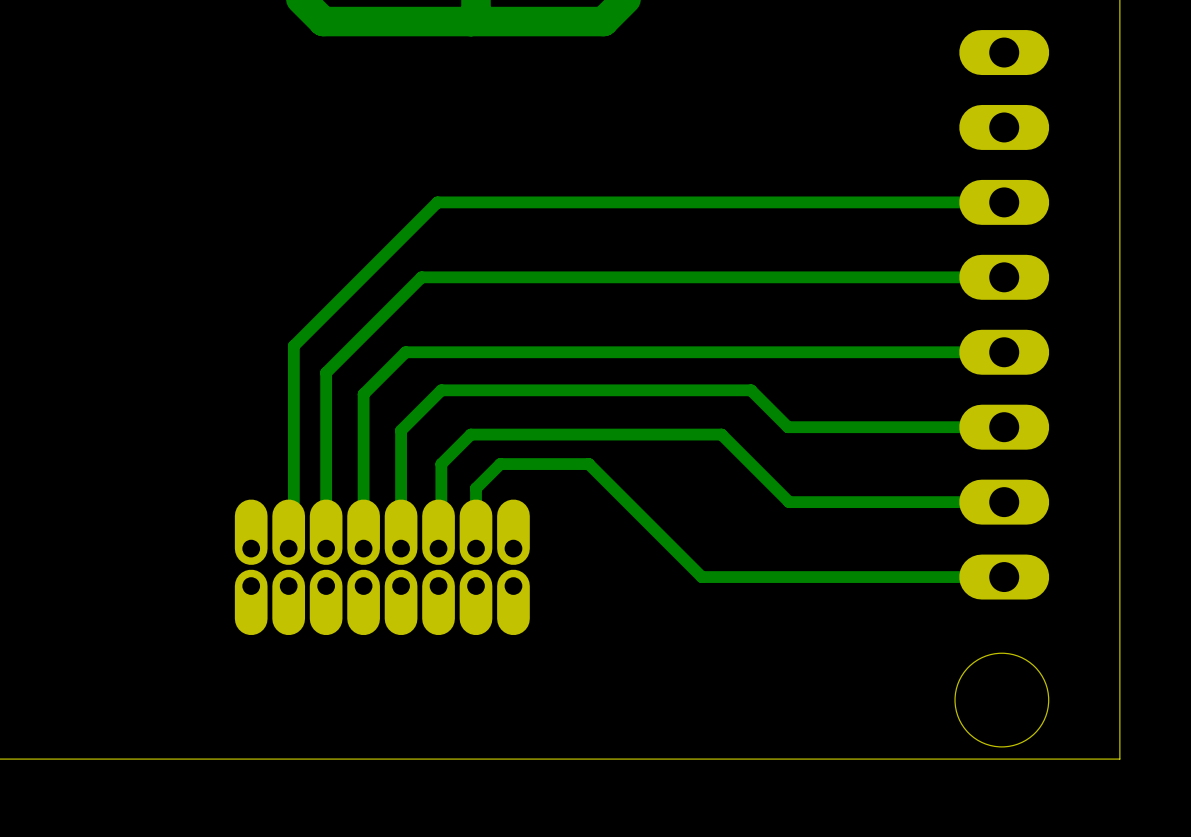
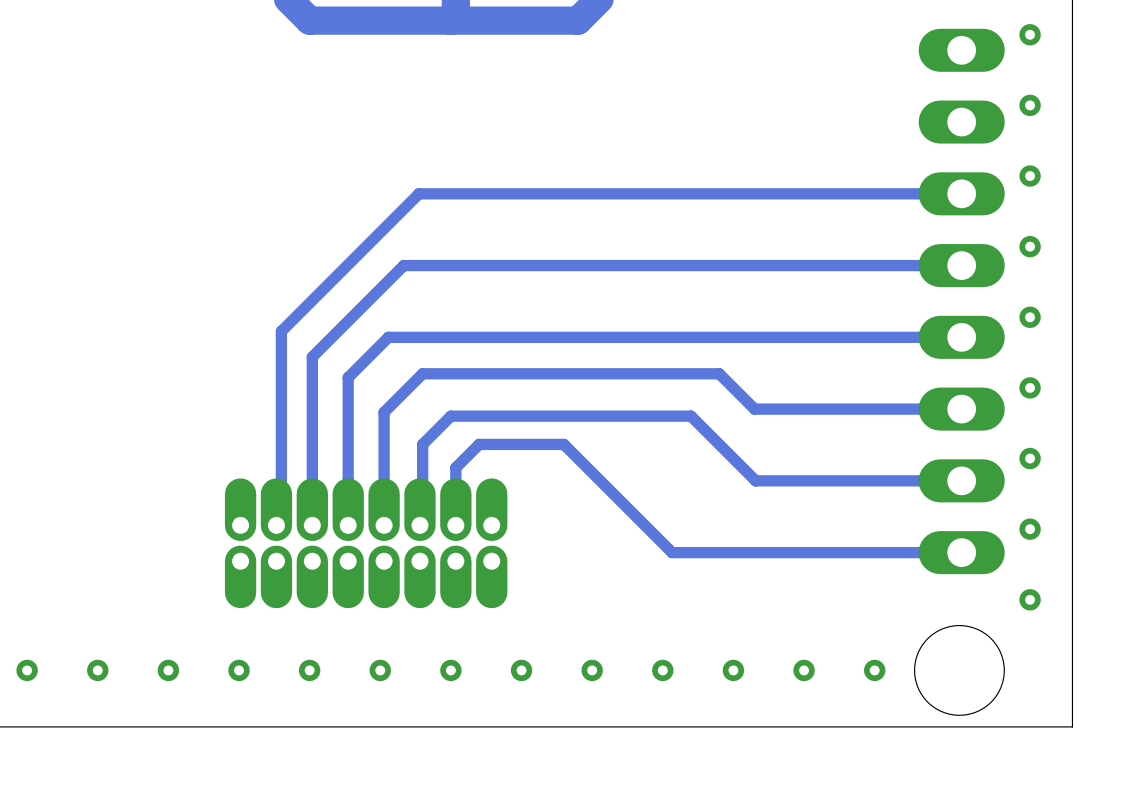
via: none -> (1030, 34)
via: none -> (1030, 105)
via: none -> (1030, 176)
via: none -> (1030, 246)
via: none -> (1030, 317)
via: none -> (1030, 387)
via: none -> (1030, 458)
via: none -> (1030, 529)
via: none -> (1030, 599)
via: none -> (27, 670)
via: none -> (97, 670)
via: none -> (168, 670)
via: none -> (239, 670)
via: none -> (309, 670)
via: none -> (380, 670)
via: none -> (450, 670)
via: none -> (521, 670)
via: none -> (592, 670)
via: none -> (662, 670)
via: none -> (733, 670)
via: none -> (804, 670)
via: none -> (874, 670)

